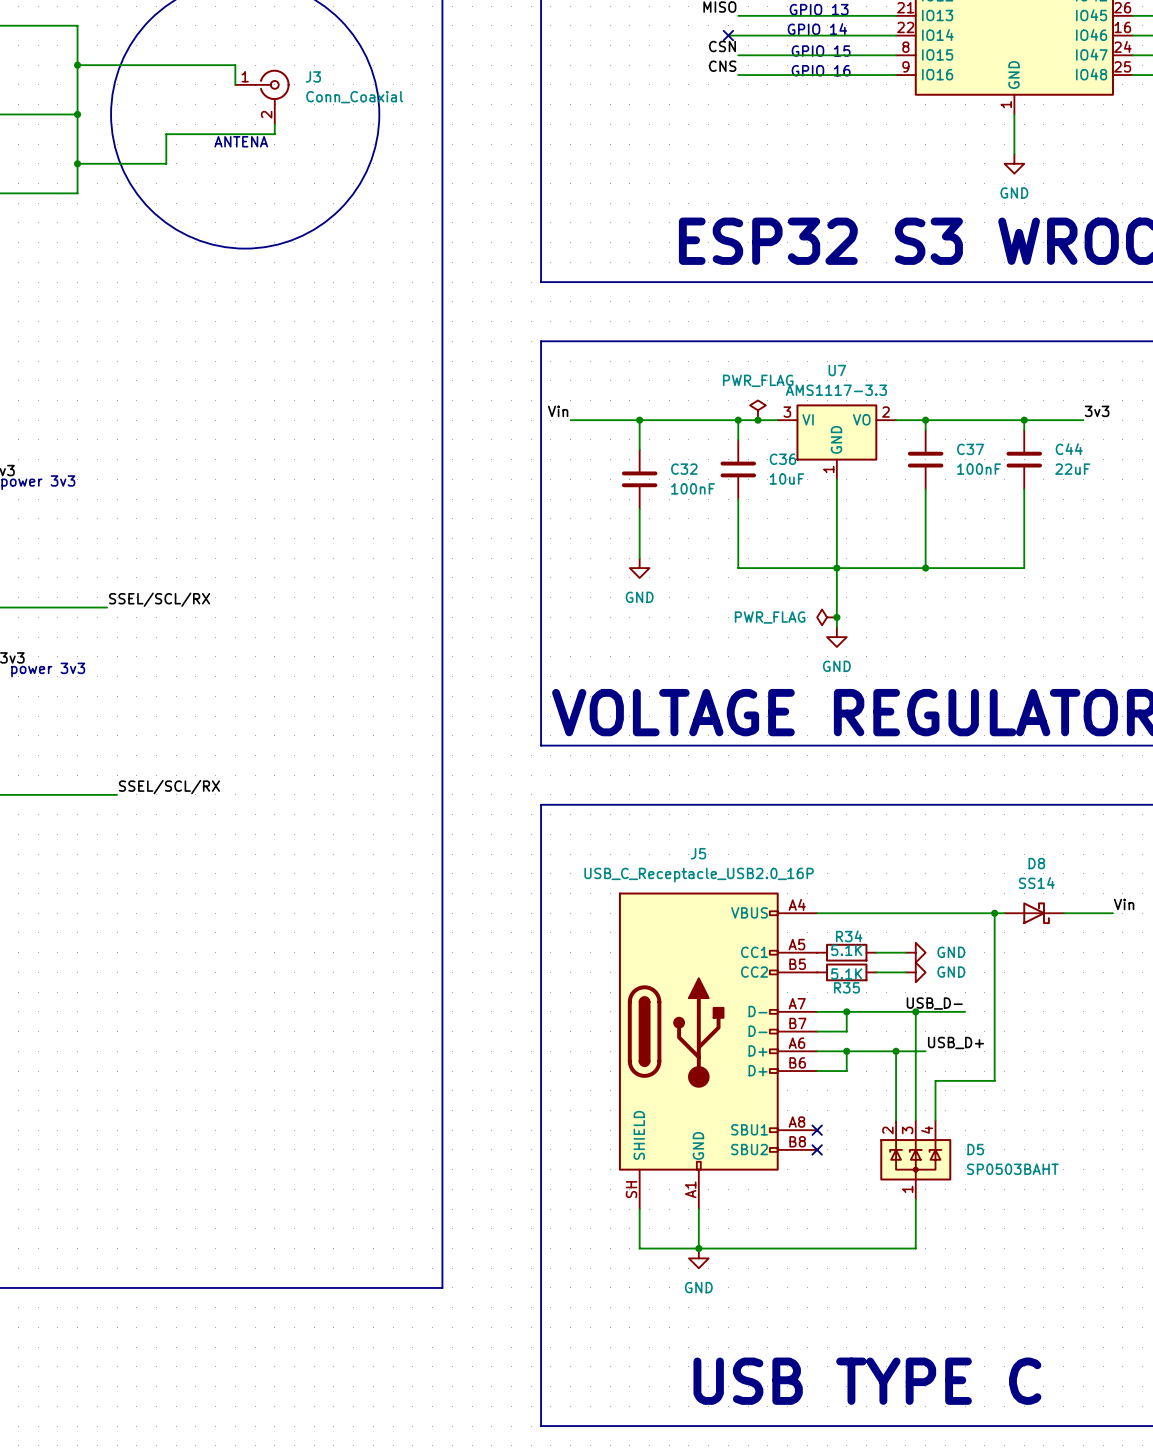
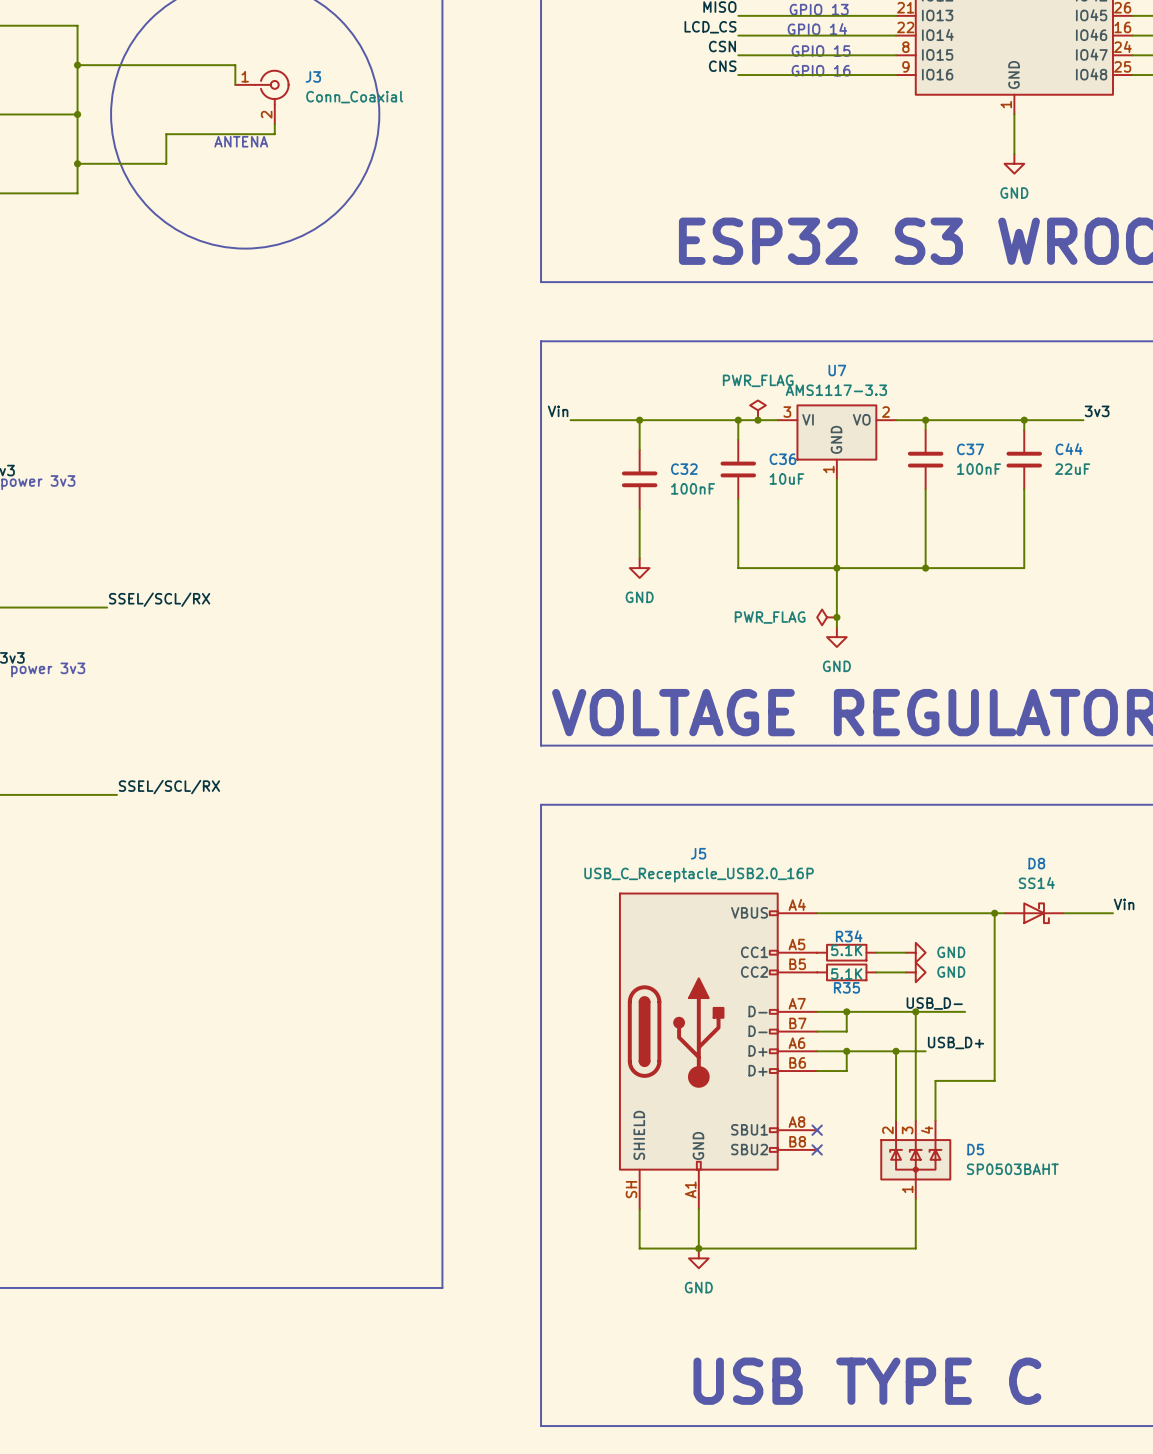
label: none -> LCD_CS (710, 27)
wire: (728, 35) (738, 35) -> none
no-connect mark: (728, 35) -> none

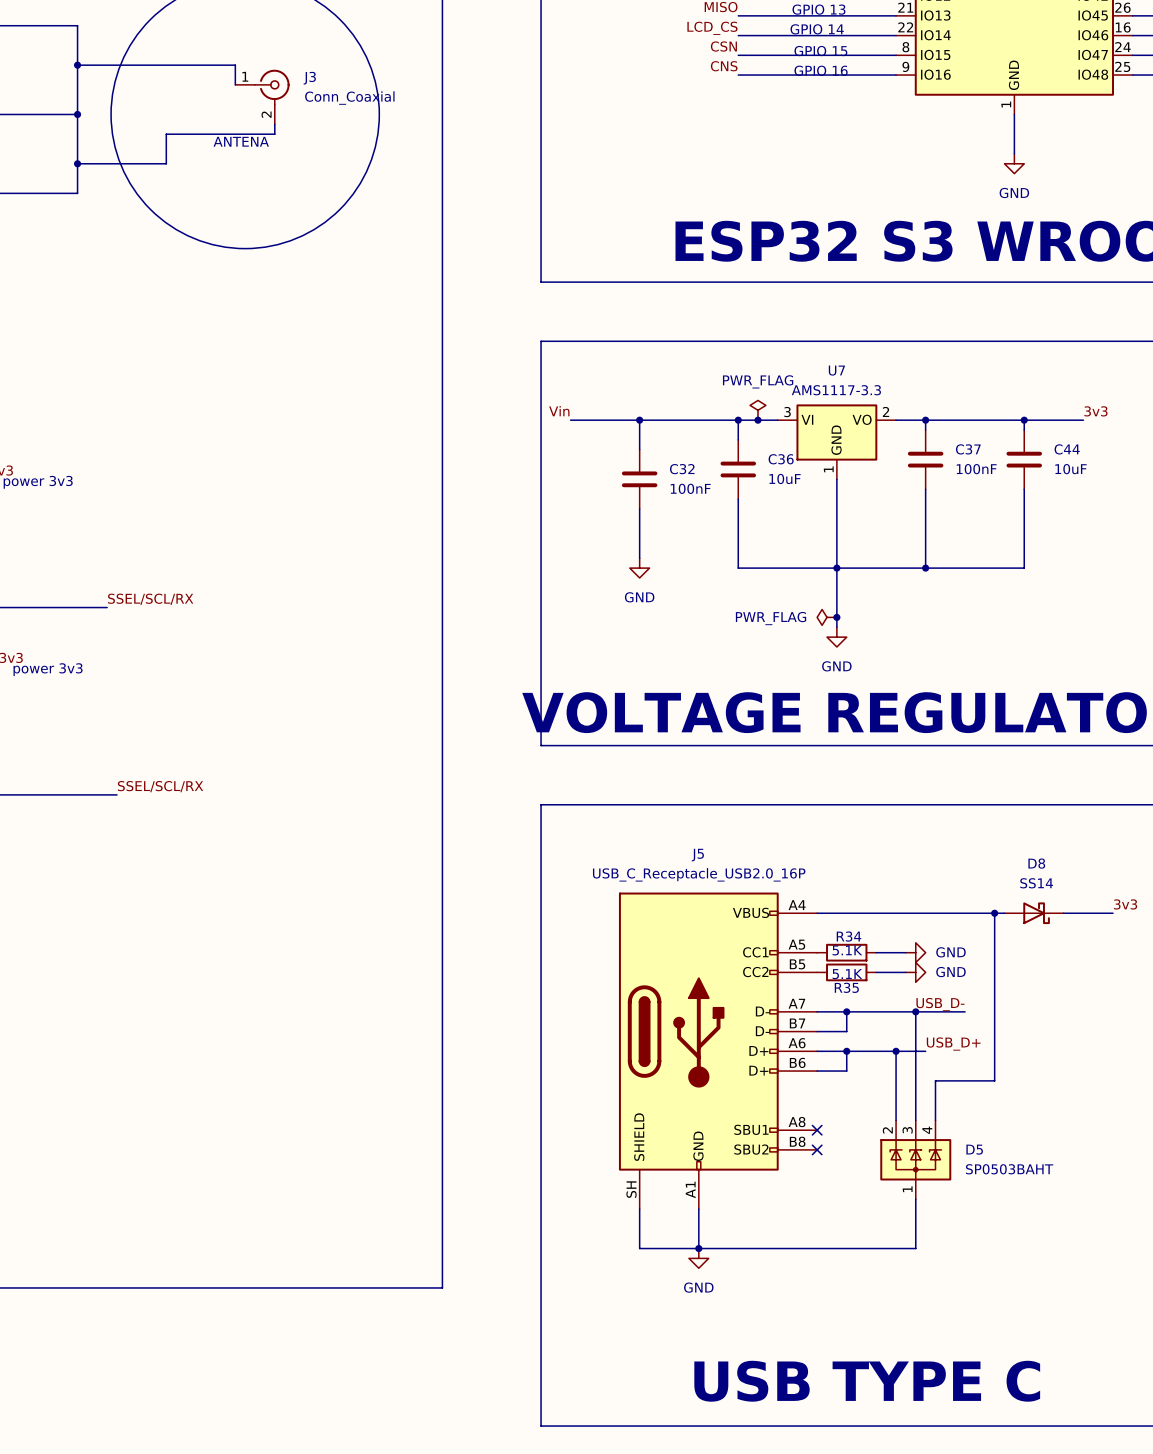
C44 value: 22uF (1072, 469) -> 10uF (1070, 469)
label: Vin (1124, 904) -> 3v3 (1125, 904)

